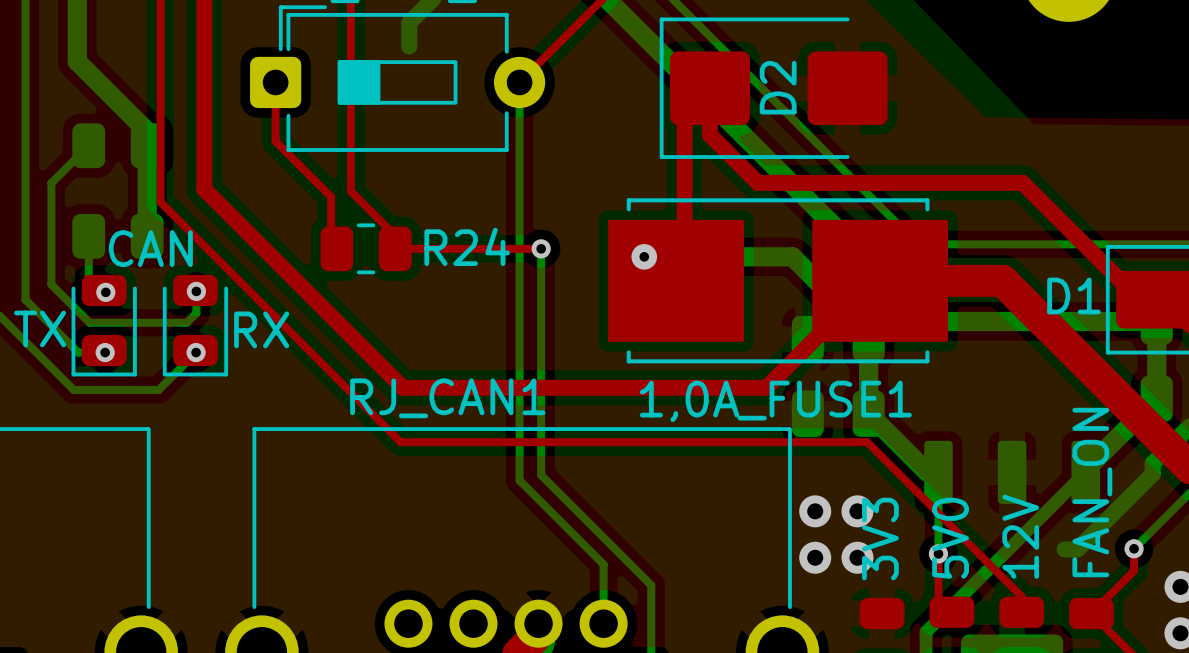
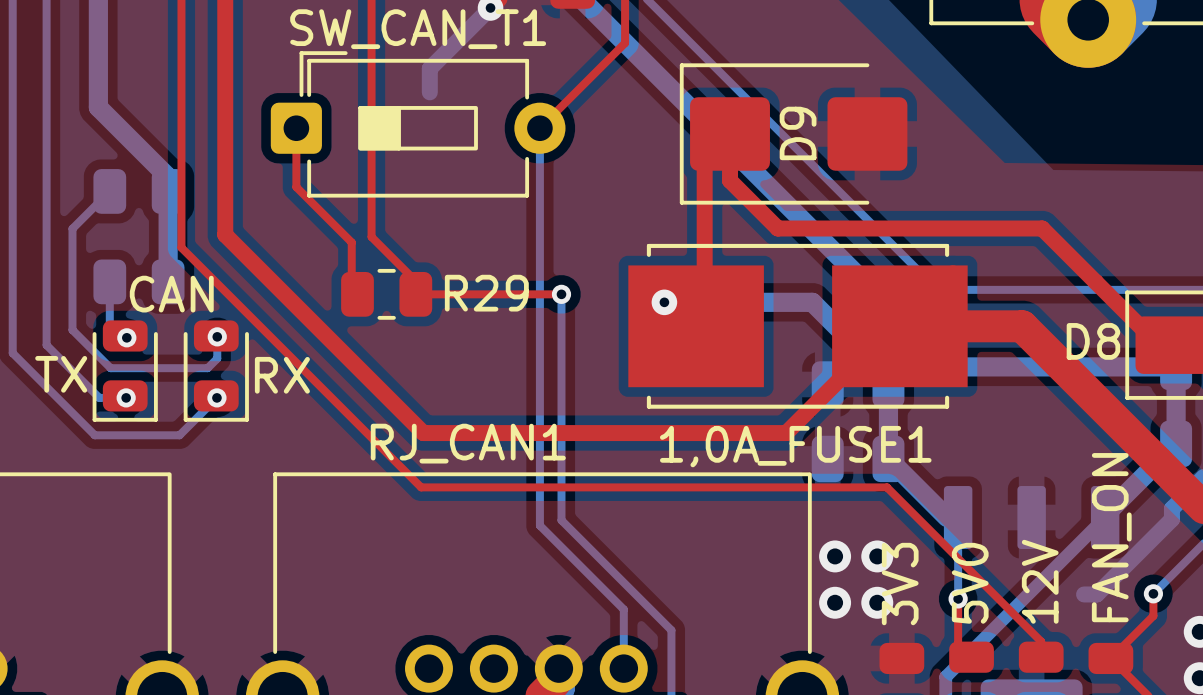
D2 name: D2 (778, 87) -> D9 (798, 133)
R24 name: R24 (467, 246) -> R29 (486, 293)
D1 name: D1 (1073, 295) -> D8 (1093, 341)

